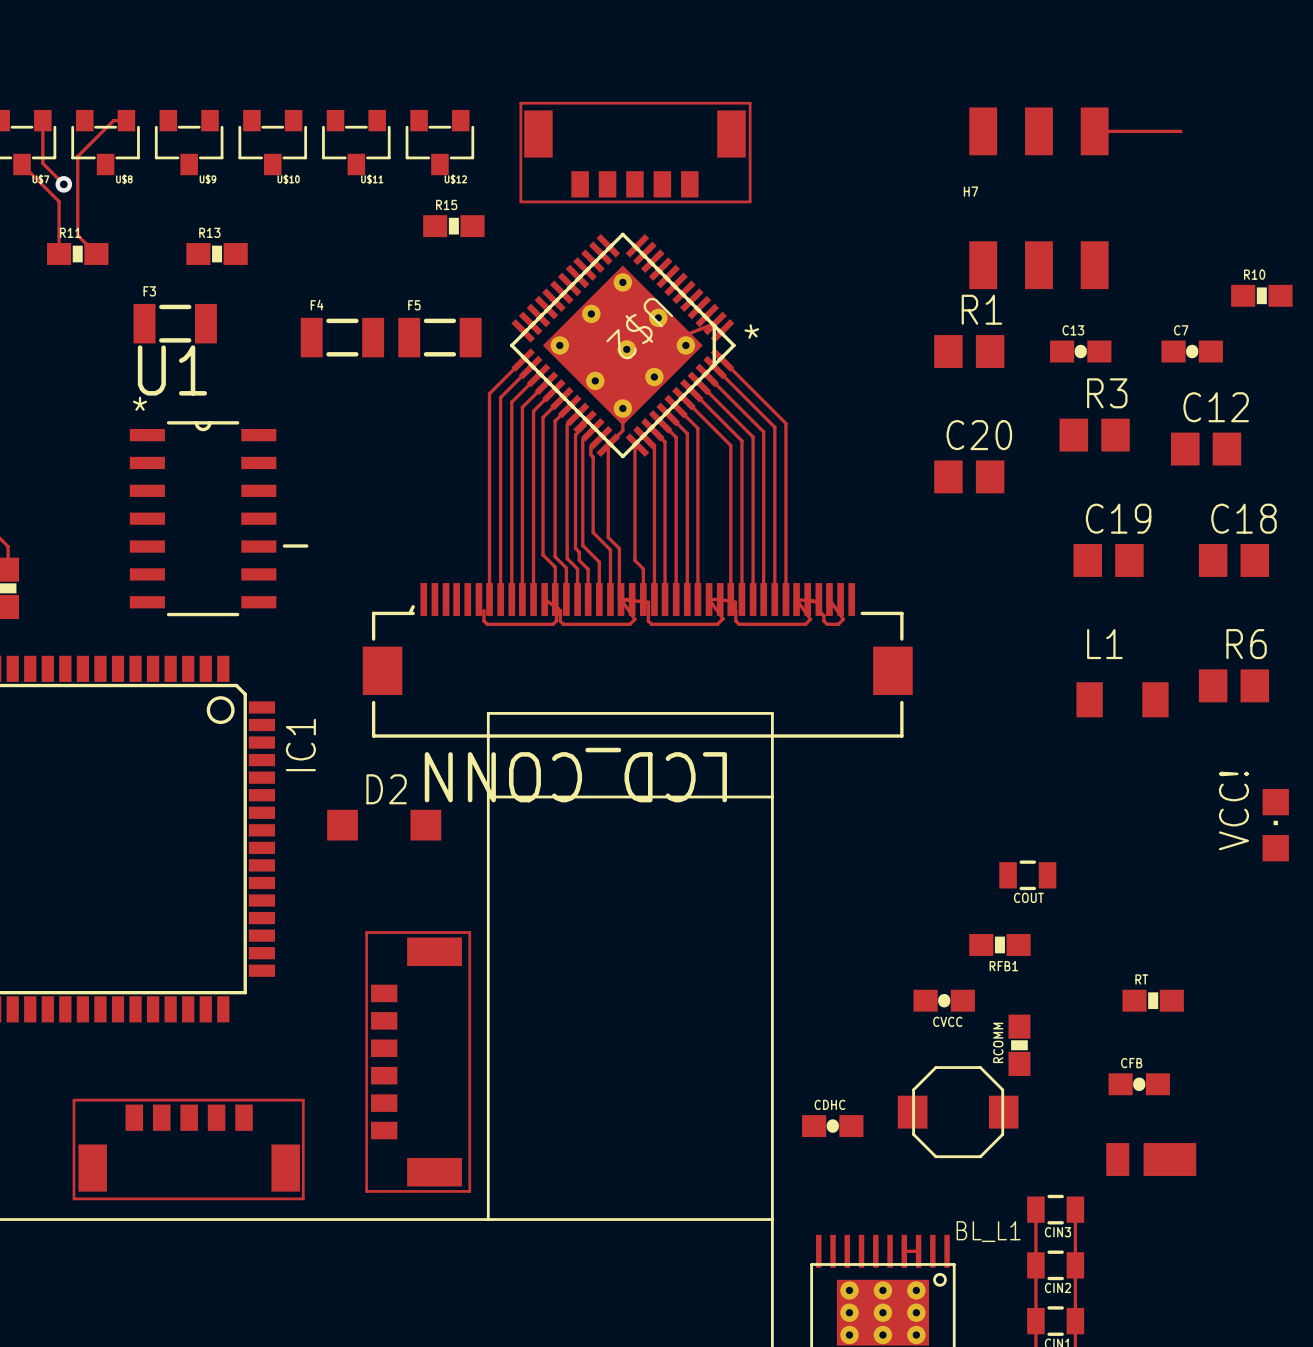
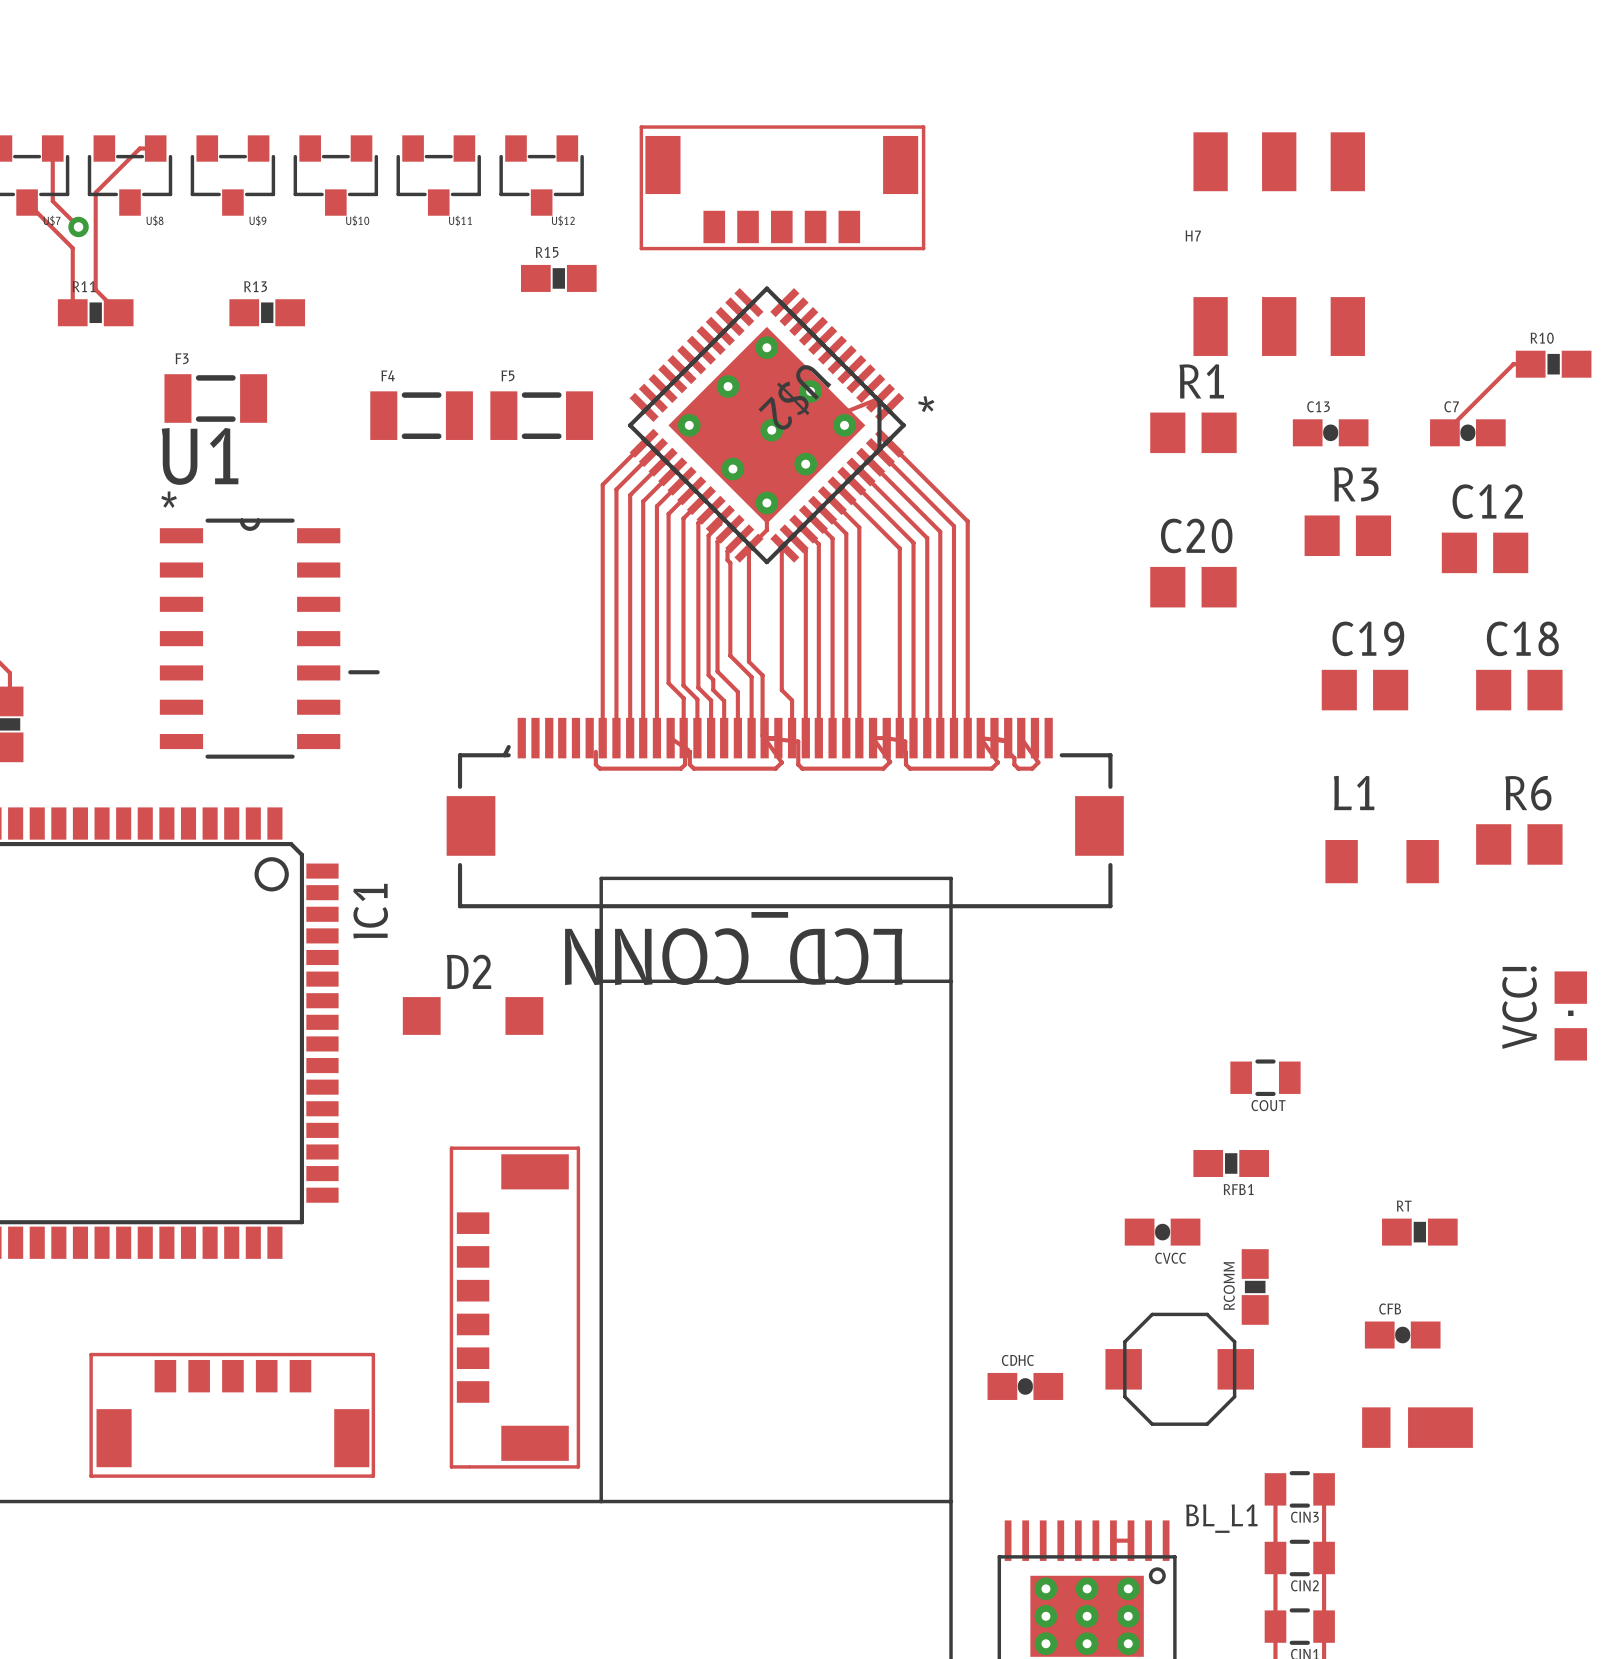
track: (1094, 131) (1180, 131) -> none
track: none -> (1530, 364) (1513, 364) (1444, 432)

